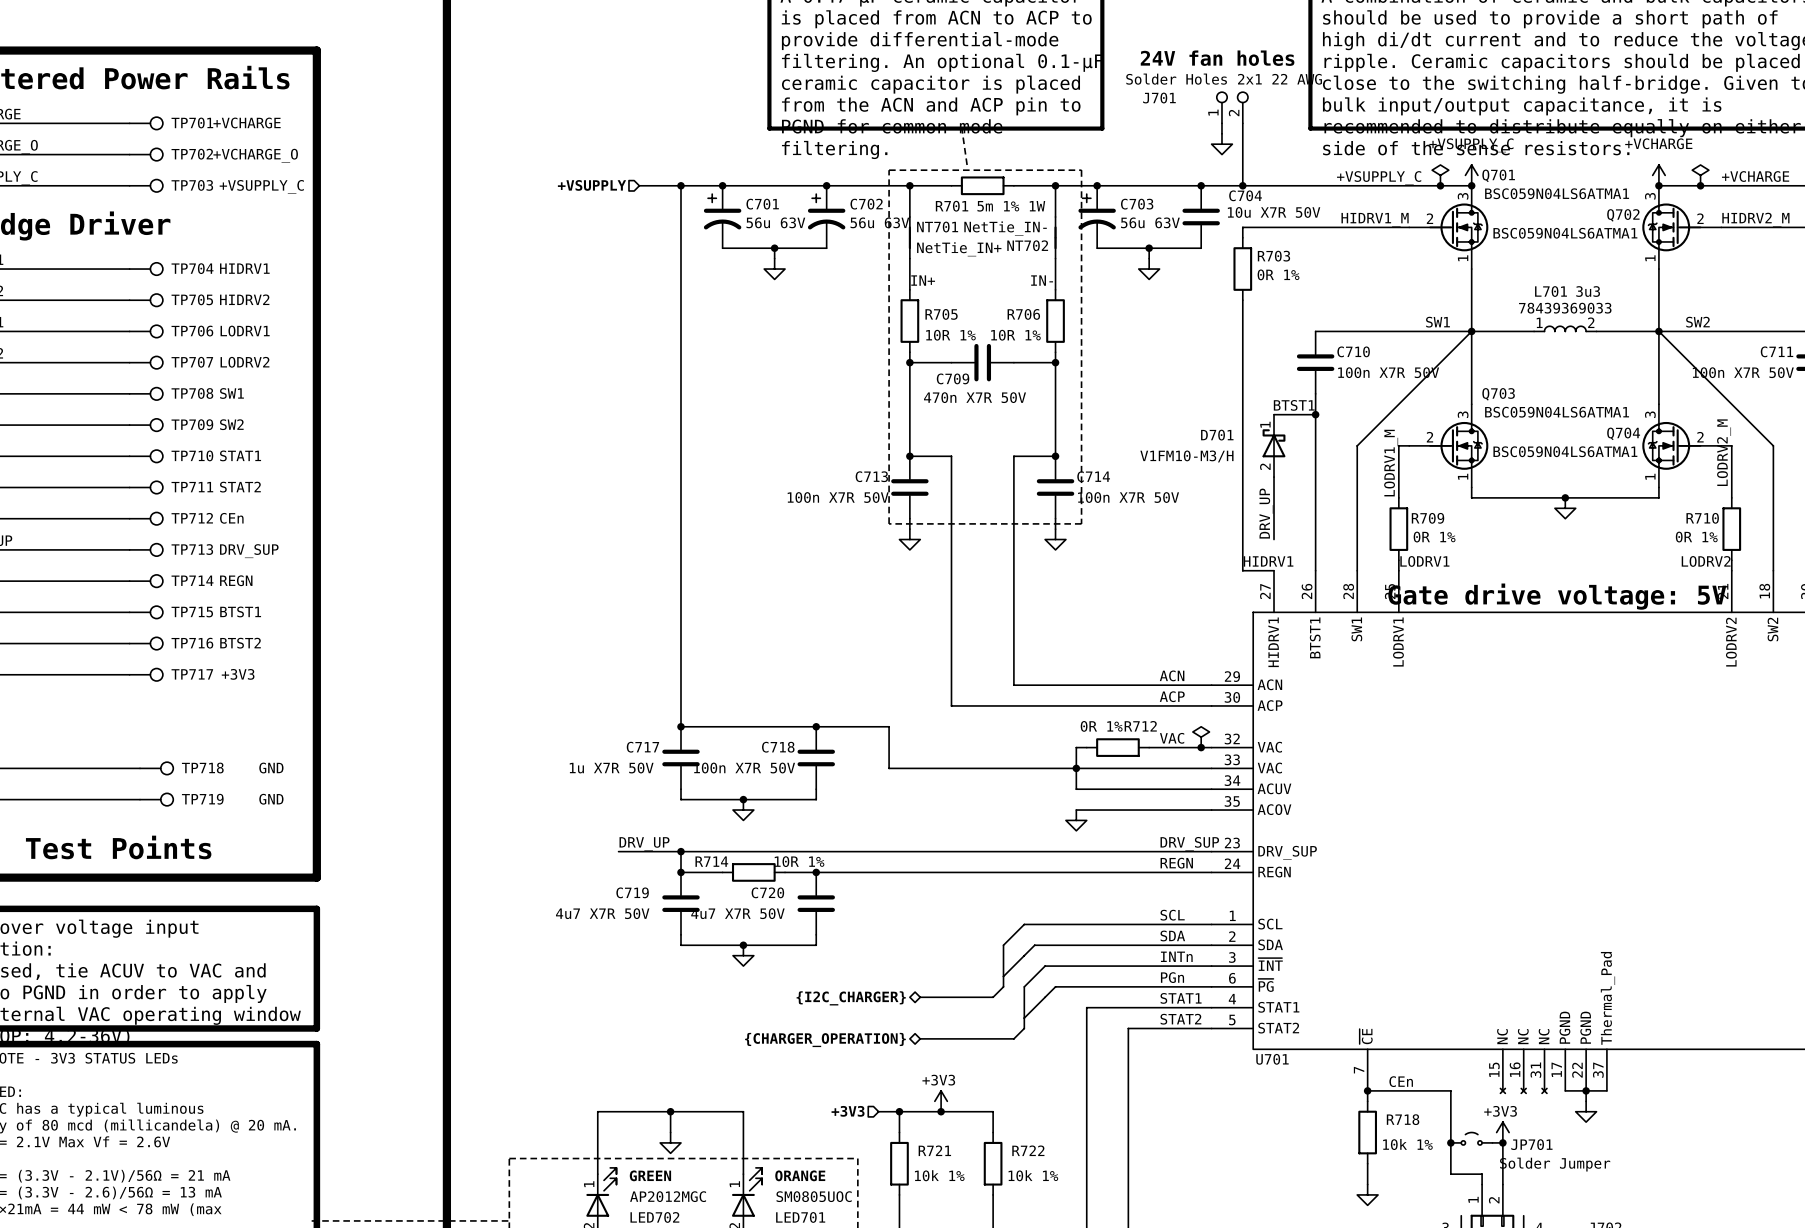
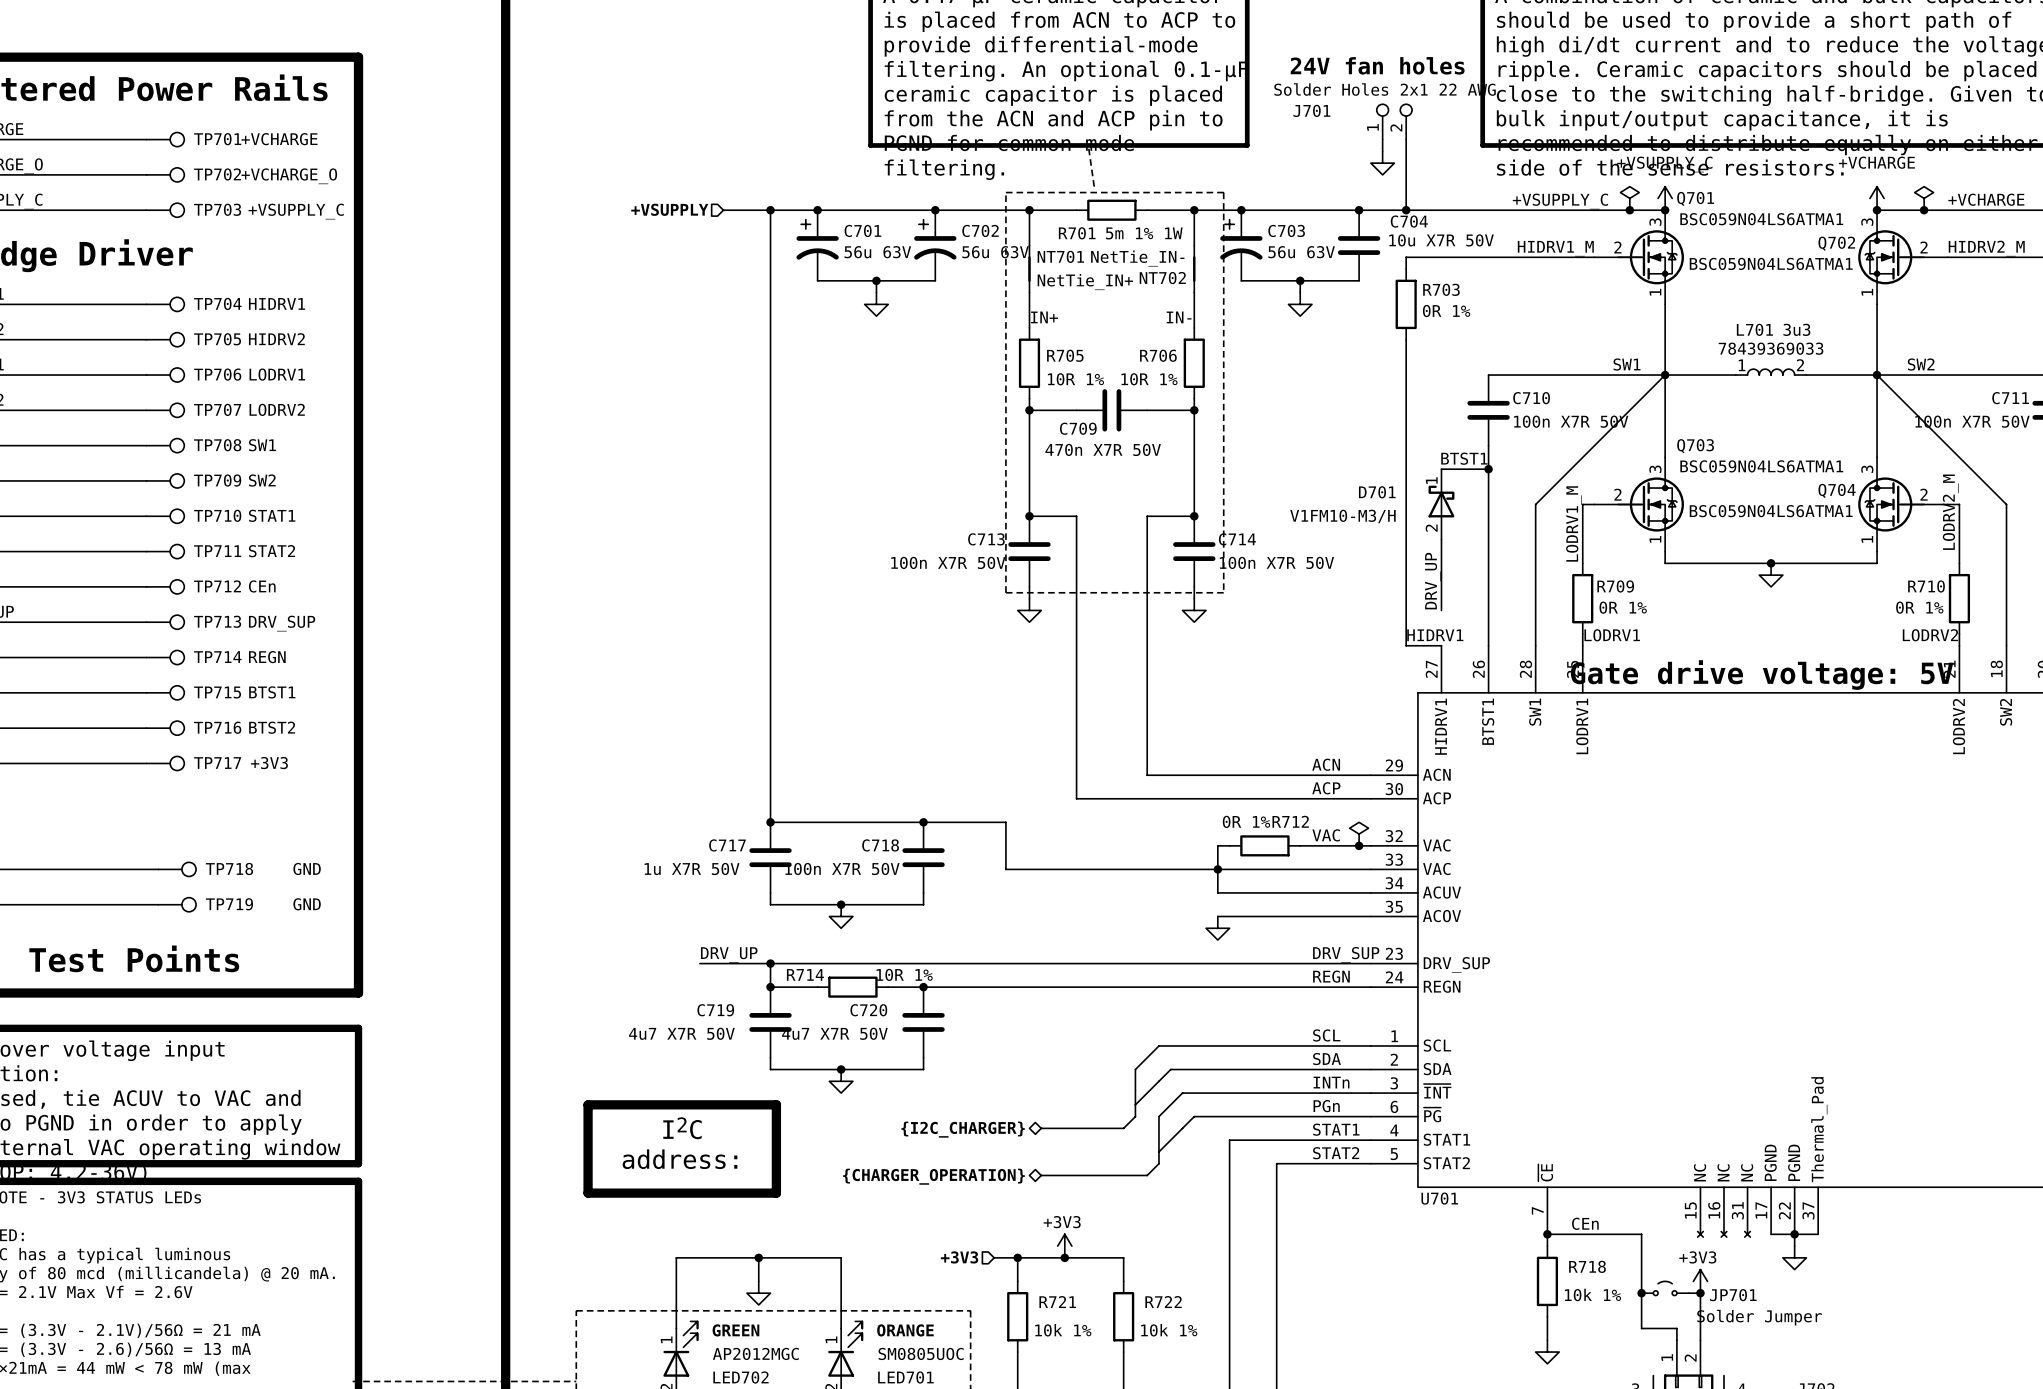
line: none -> (588, 1104) (776, 1104) (776, 1193) (588, 1193) (588, 1104)
text: none -> I2C (682, 1128)
text: none -> address: (680, 1159)

